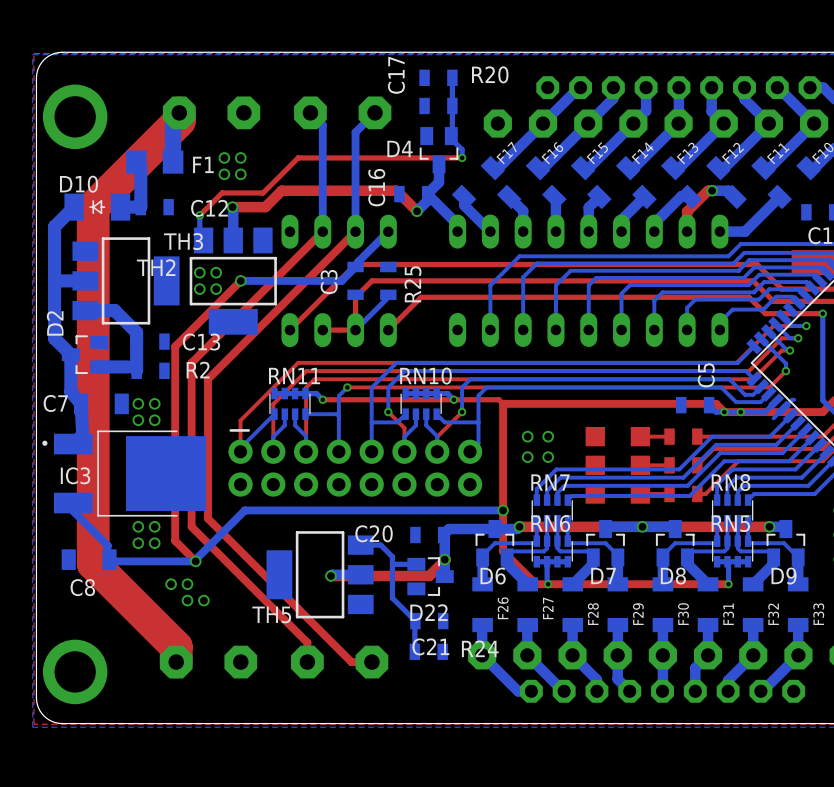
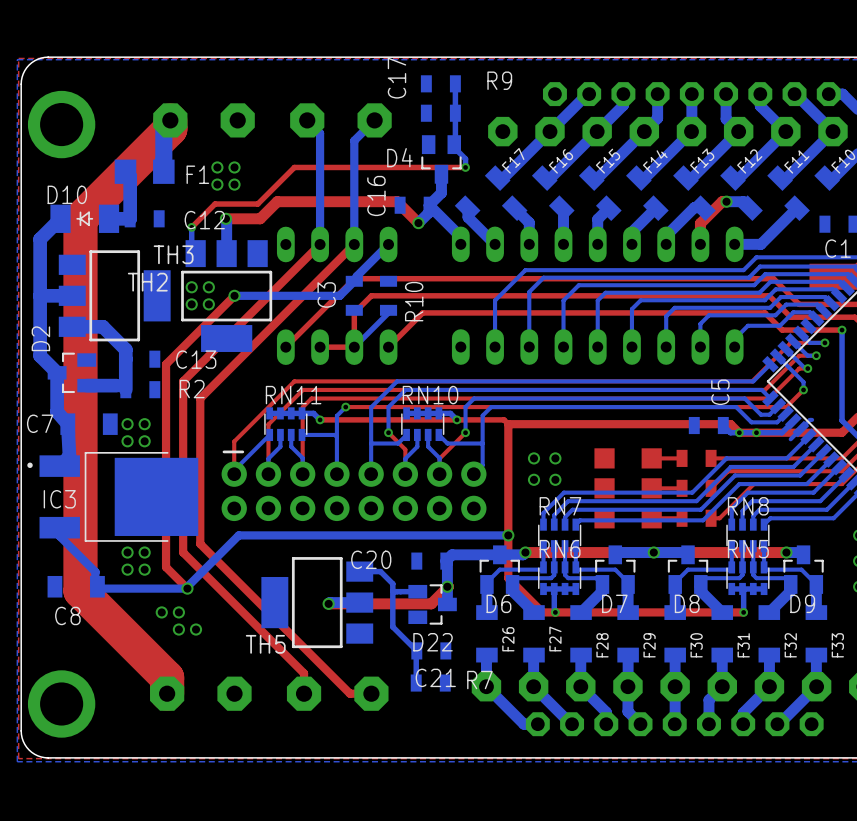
R20 name: R20 (490, 74) -> R9 (499, 80)
R25 name: R25 (412, 284) -> R10 (414, 301)
R24 name: R24 (480, 648) -> R7 (479, 680)

